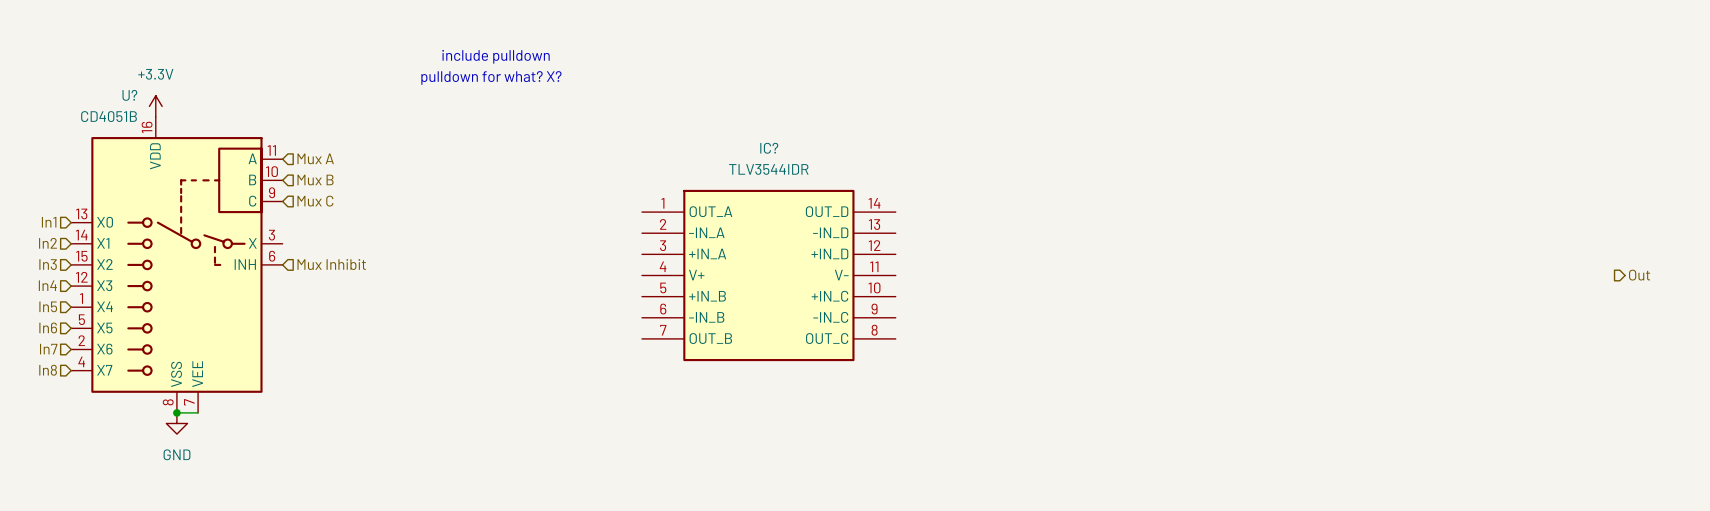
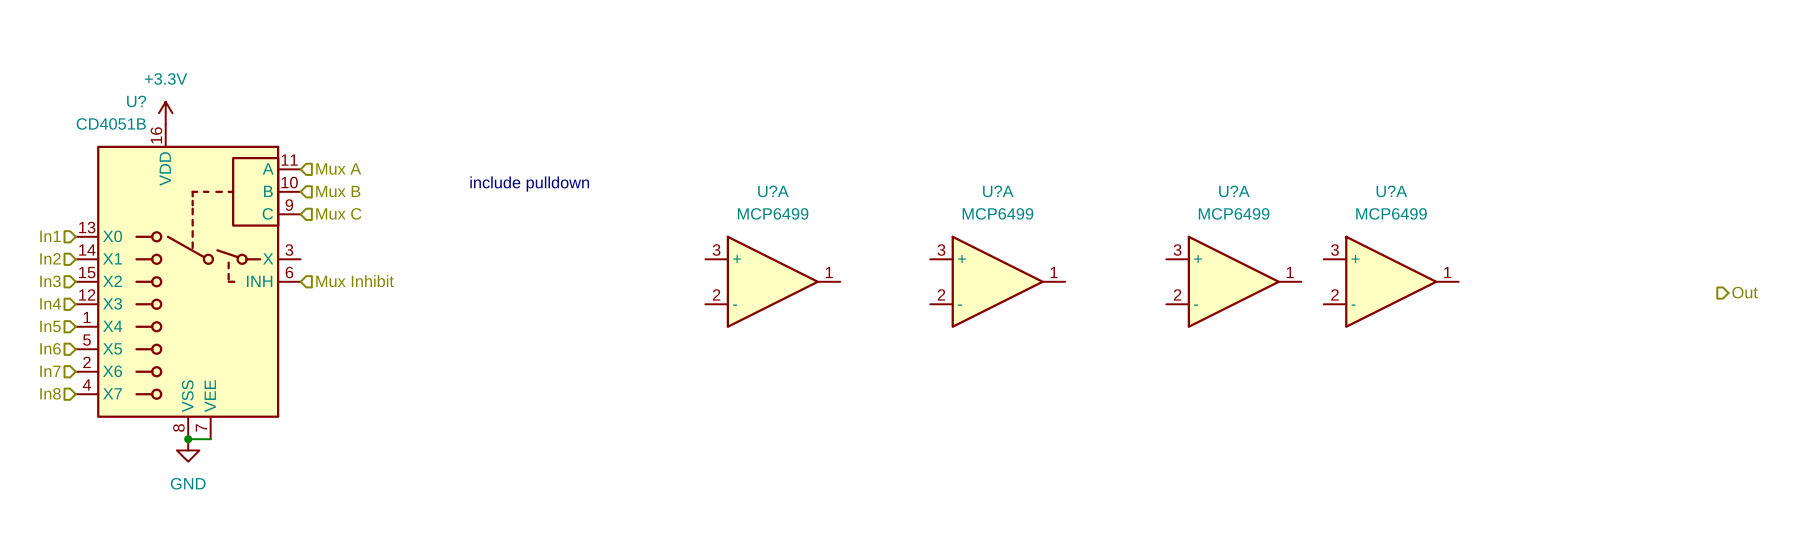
text position: include pulldown (495, 56) -> include pulldown (529, 184)
text: pulldown for what? X? (491, 77) -> none
U?A: none -> MCP6499 (772, 281)
U?A: none -> MCP6499 (997, 281)
U?A: none -> MCP6499 (1233, 281)
U?A: none -> MCP6499 (1391, 281)
IC?: TLV3544IDR (768, 275) -> none

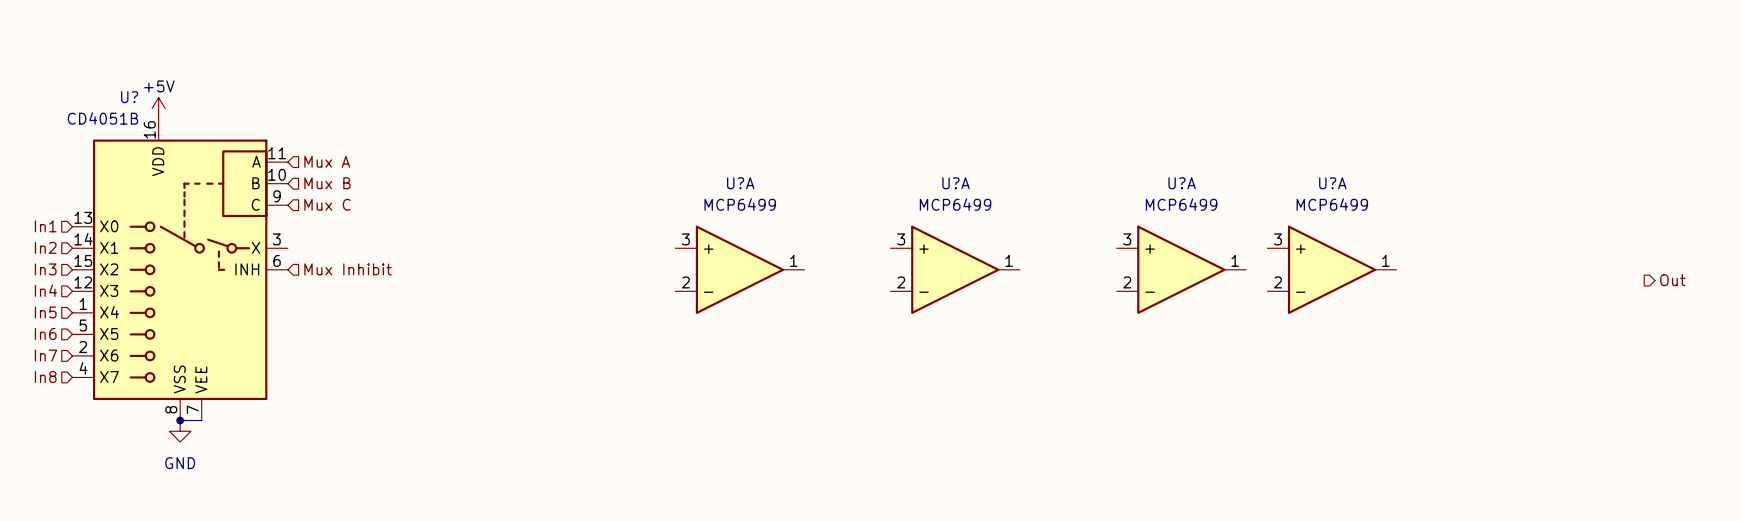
power symbol: +3.3V (165, 113) -> +5V (158, 108)
text: include pulldown (529, 184) -> none

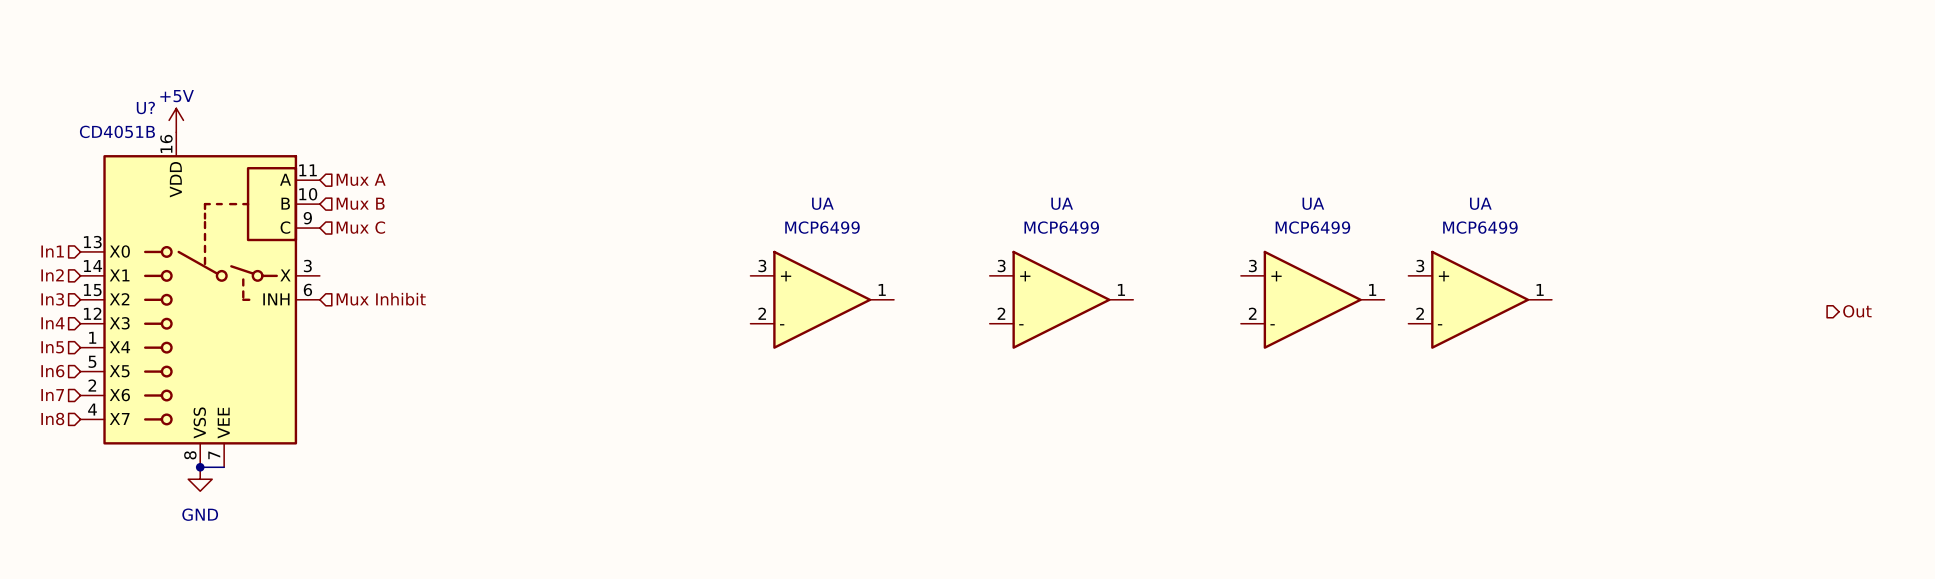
U?A name: U?A (740, 183) -> UA (822, 203)
U?A name: U?A (956, 183) -> UA (1062, 203)
U?A name: U?A (1182, 183) -> UA (1313, 203)
U?A name: U?A (1332, 183) -> UA (1480, 203)

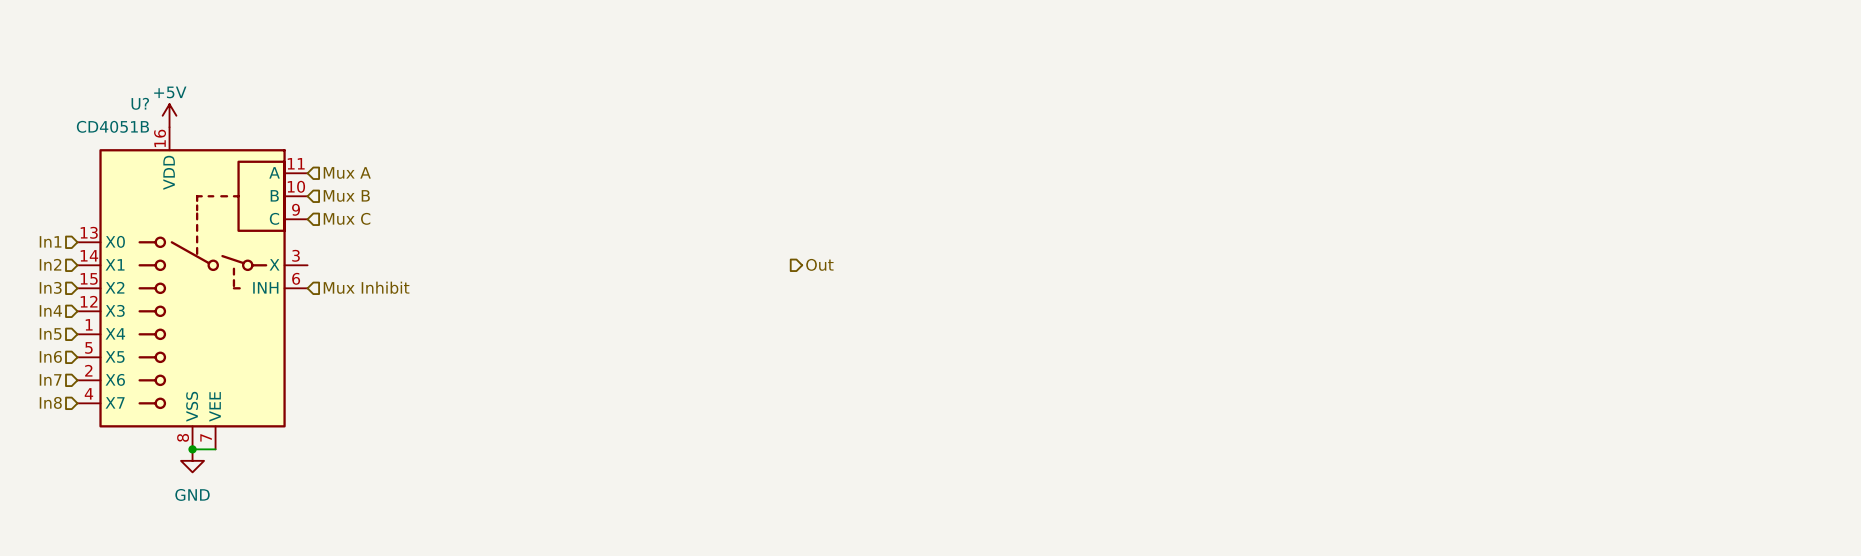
hierarchical label: none -> Out (819, 264)
UA: MCP6499 (822, 299) -> none
UA: MCP6499 (1061, 299) -> none
UA: MCP6499 (1312, 299) -> none
UA: MCP6499 (1480, 299) -> none
hierarchical label: Out (1857, 311) -> none

